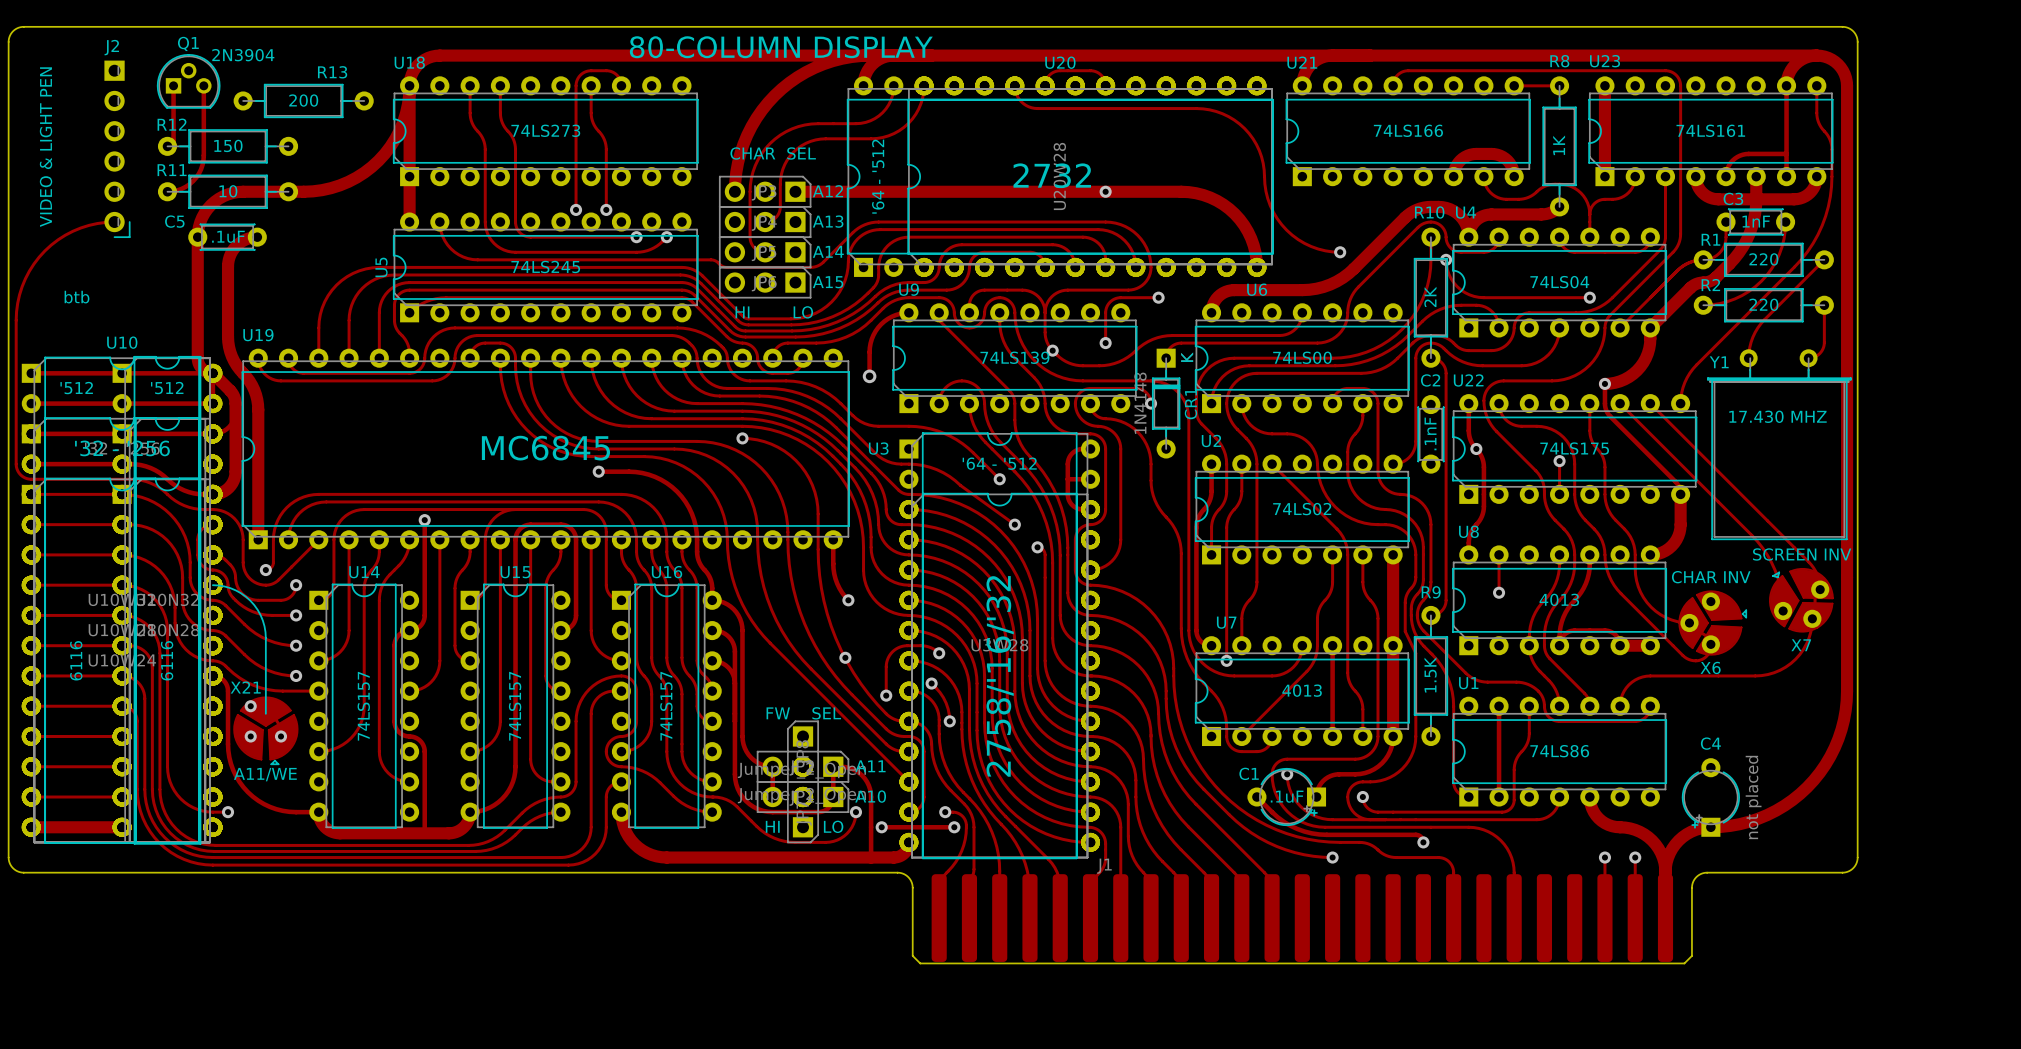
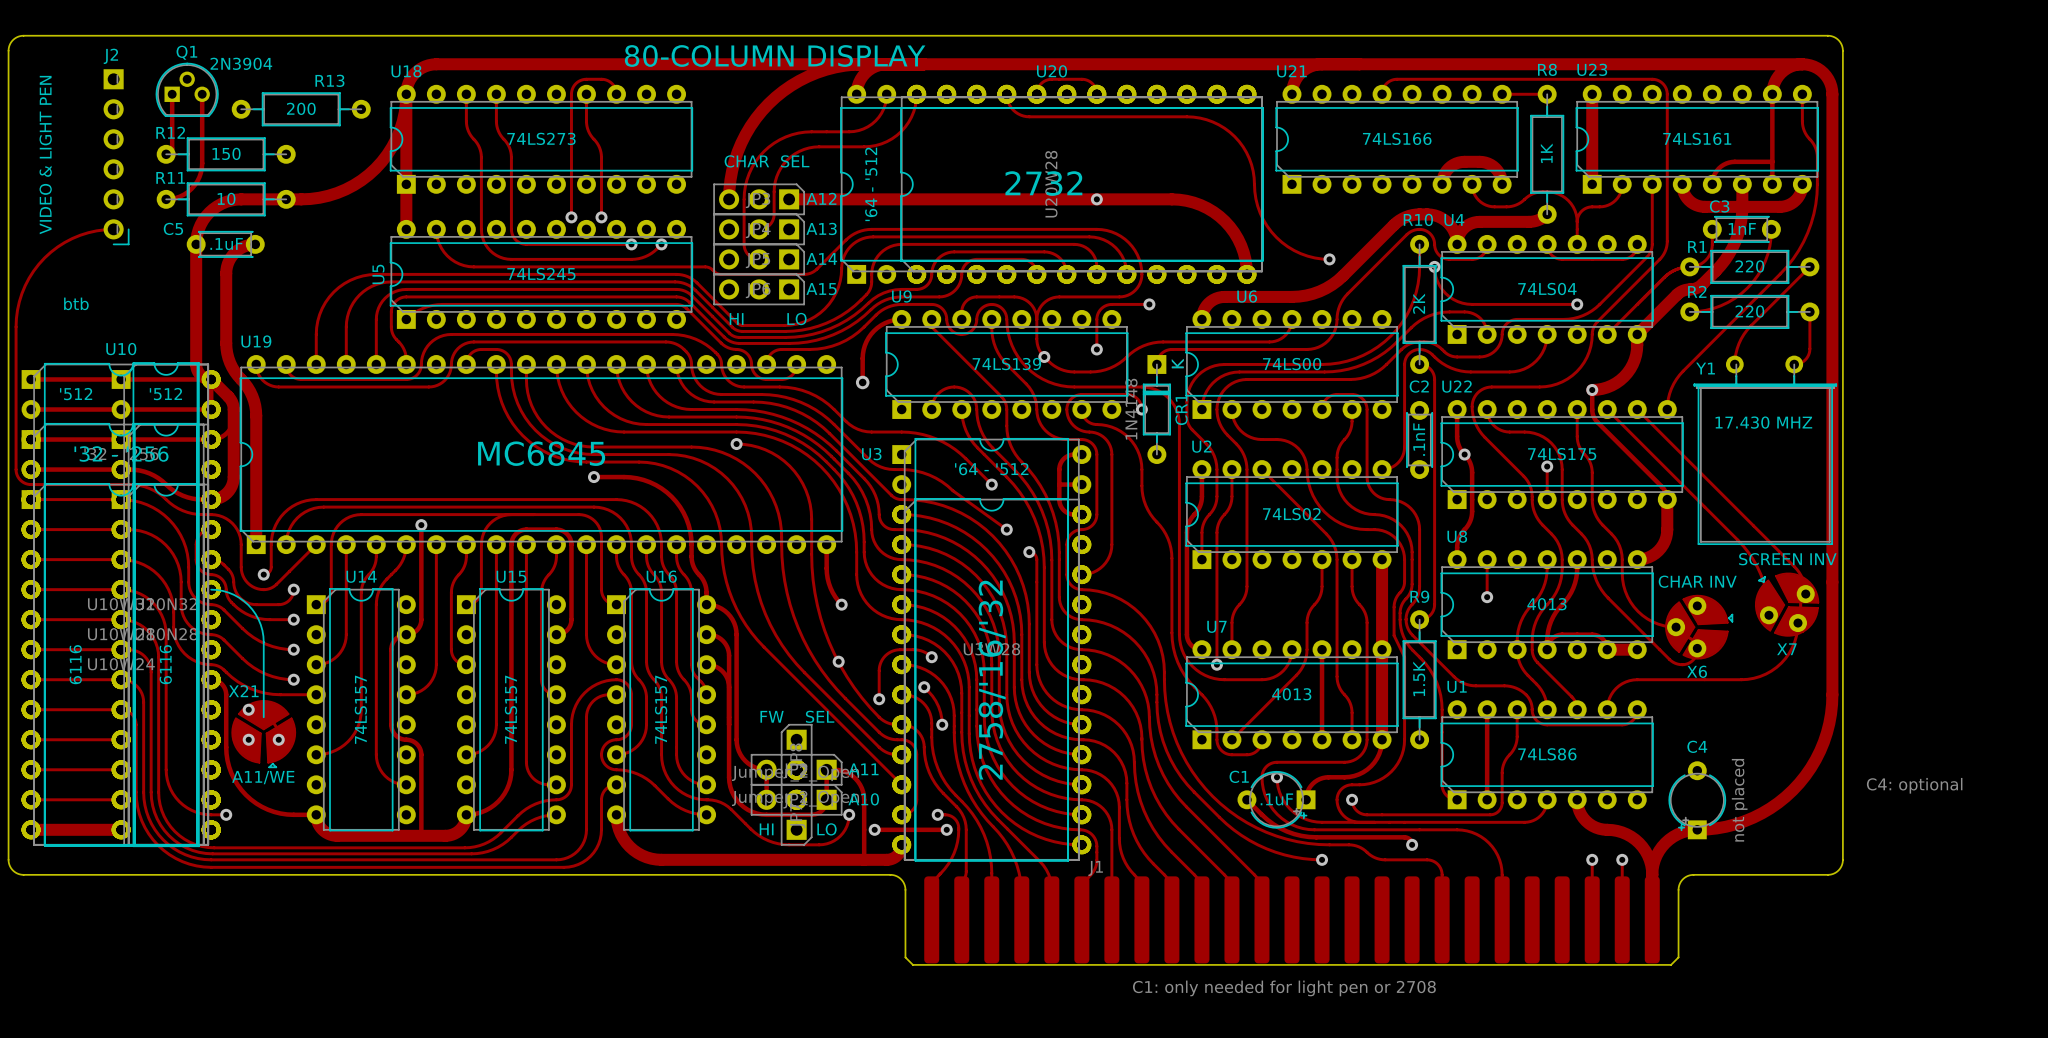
text: none -> C4: optional (1914, 785)
text: none -> C1: only needed for light pen or 2708 (1284, 988)

